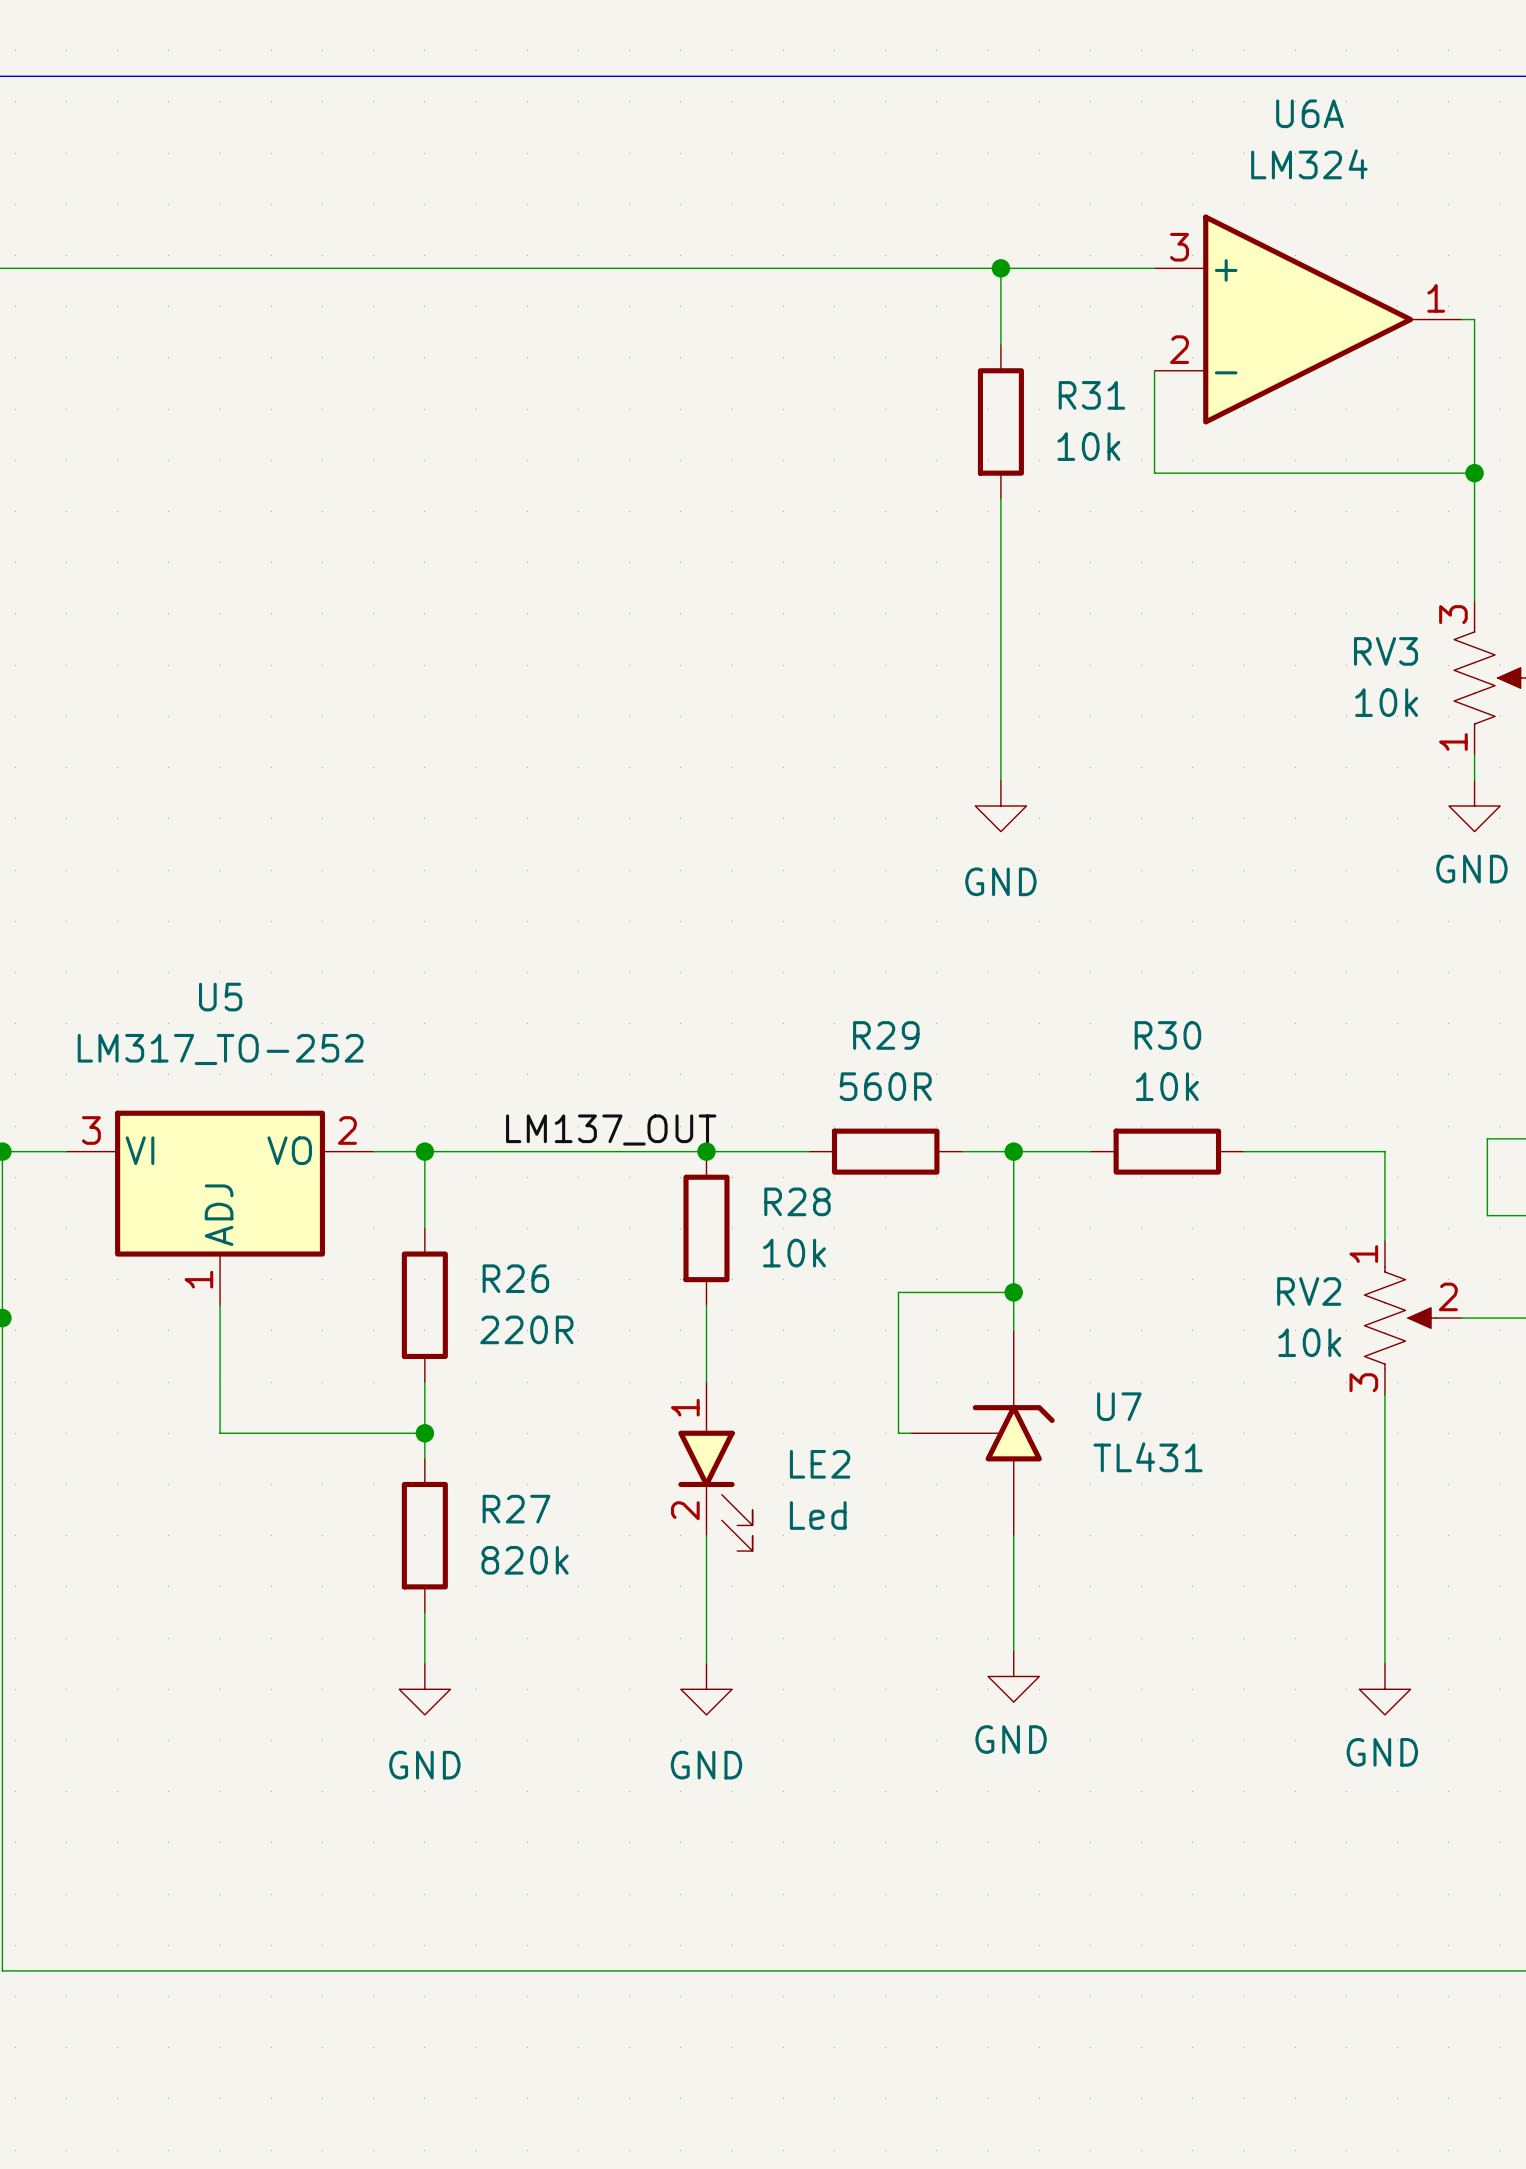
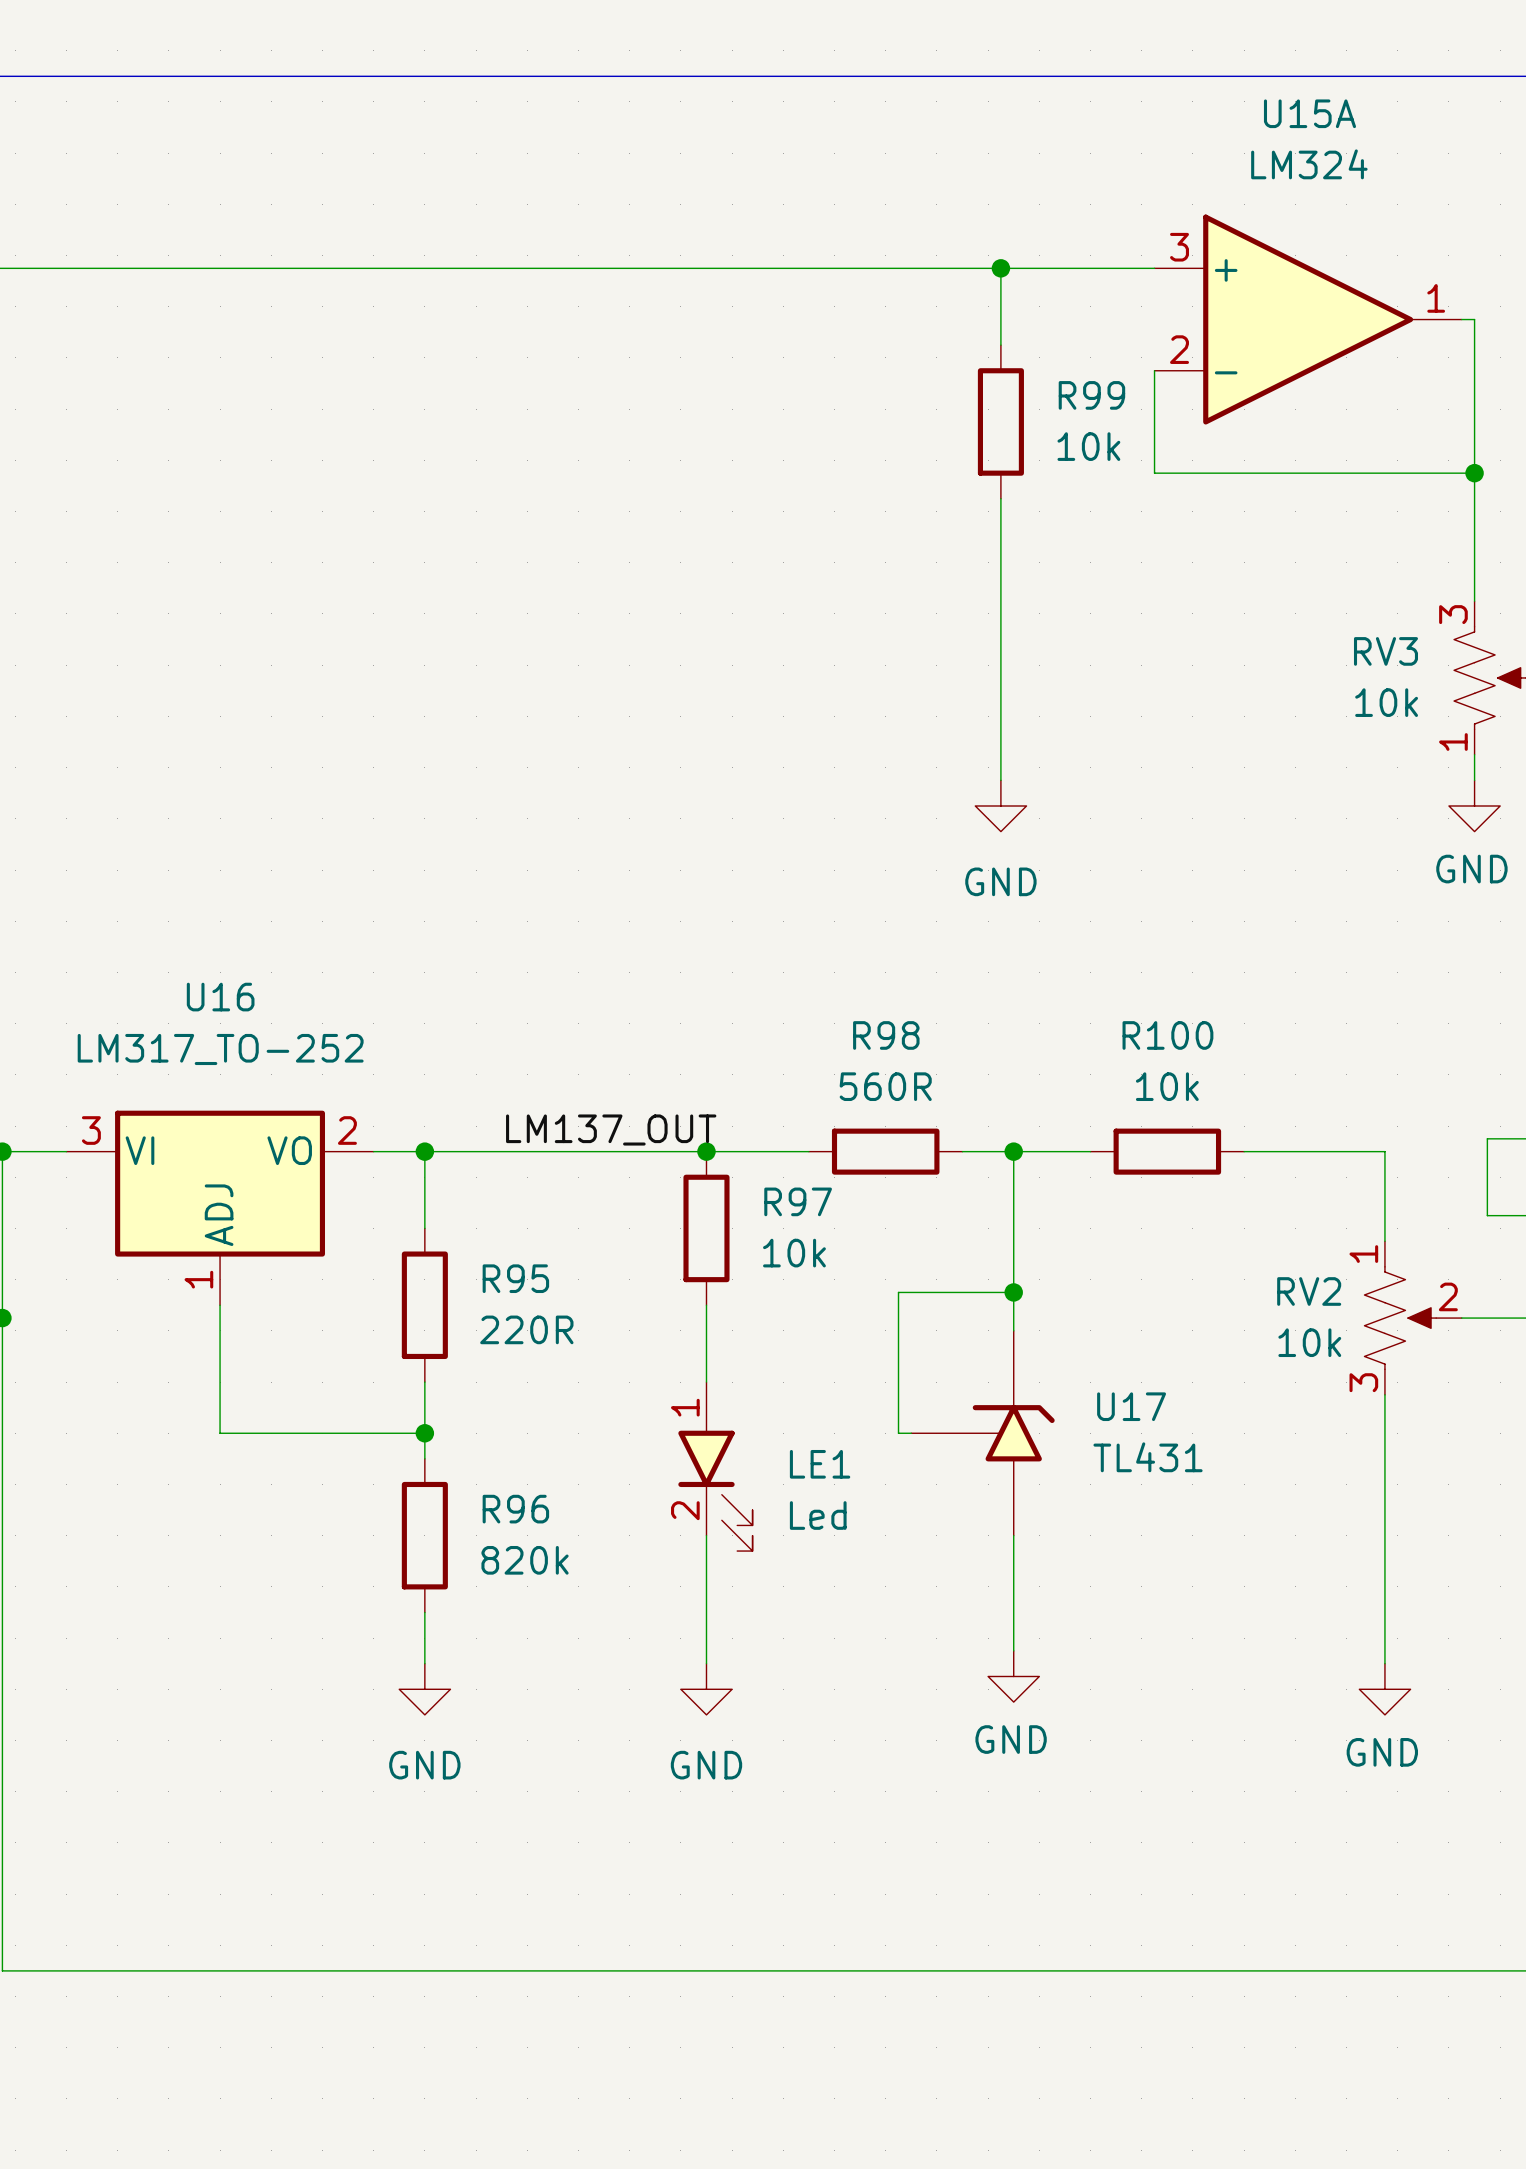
U6A name: U6A (1309, 113) -> U15A (1309, 113)
R31 name: R31 (1091, 395) -> R99 (1091, 395)
U5 name: U5 (220, 997) -> U16 (220, 997)
R29 name: R29 (886, 1035) -> R98 (886, 1035)
R30 name: R30 (1167, 1035) -> R100 (1167, 1035)
R28 name: R28 (797, 1201) -> R97 (798, 1201)
R26 name: R26 (515, 1278) -> R95 (515, 1278)
U7 name: U7 (1119, 1406) -> U17 (1131, 1406)
LE2 name: LE2 (820, 1464) -> LE1 (820, 1464)
R27 name: R27 (516, 1509) -> R96 (515, 1509)

